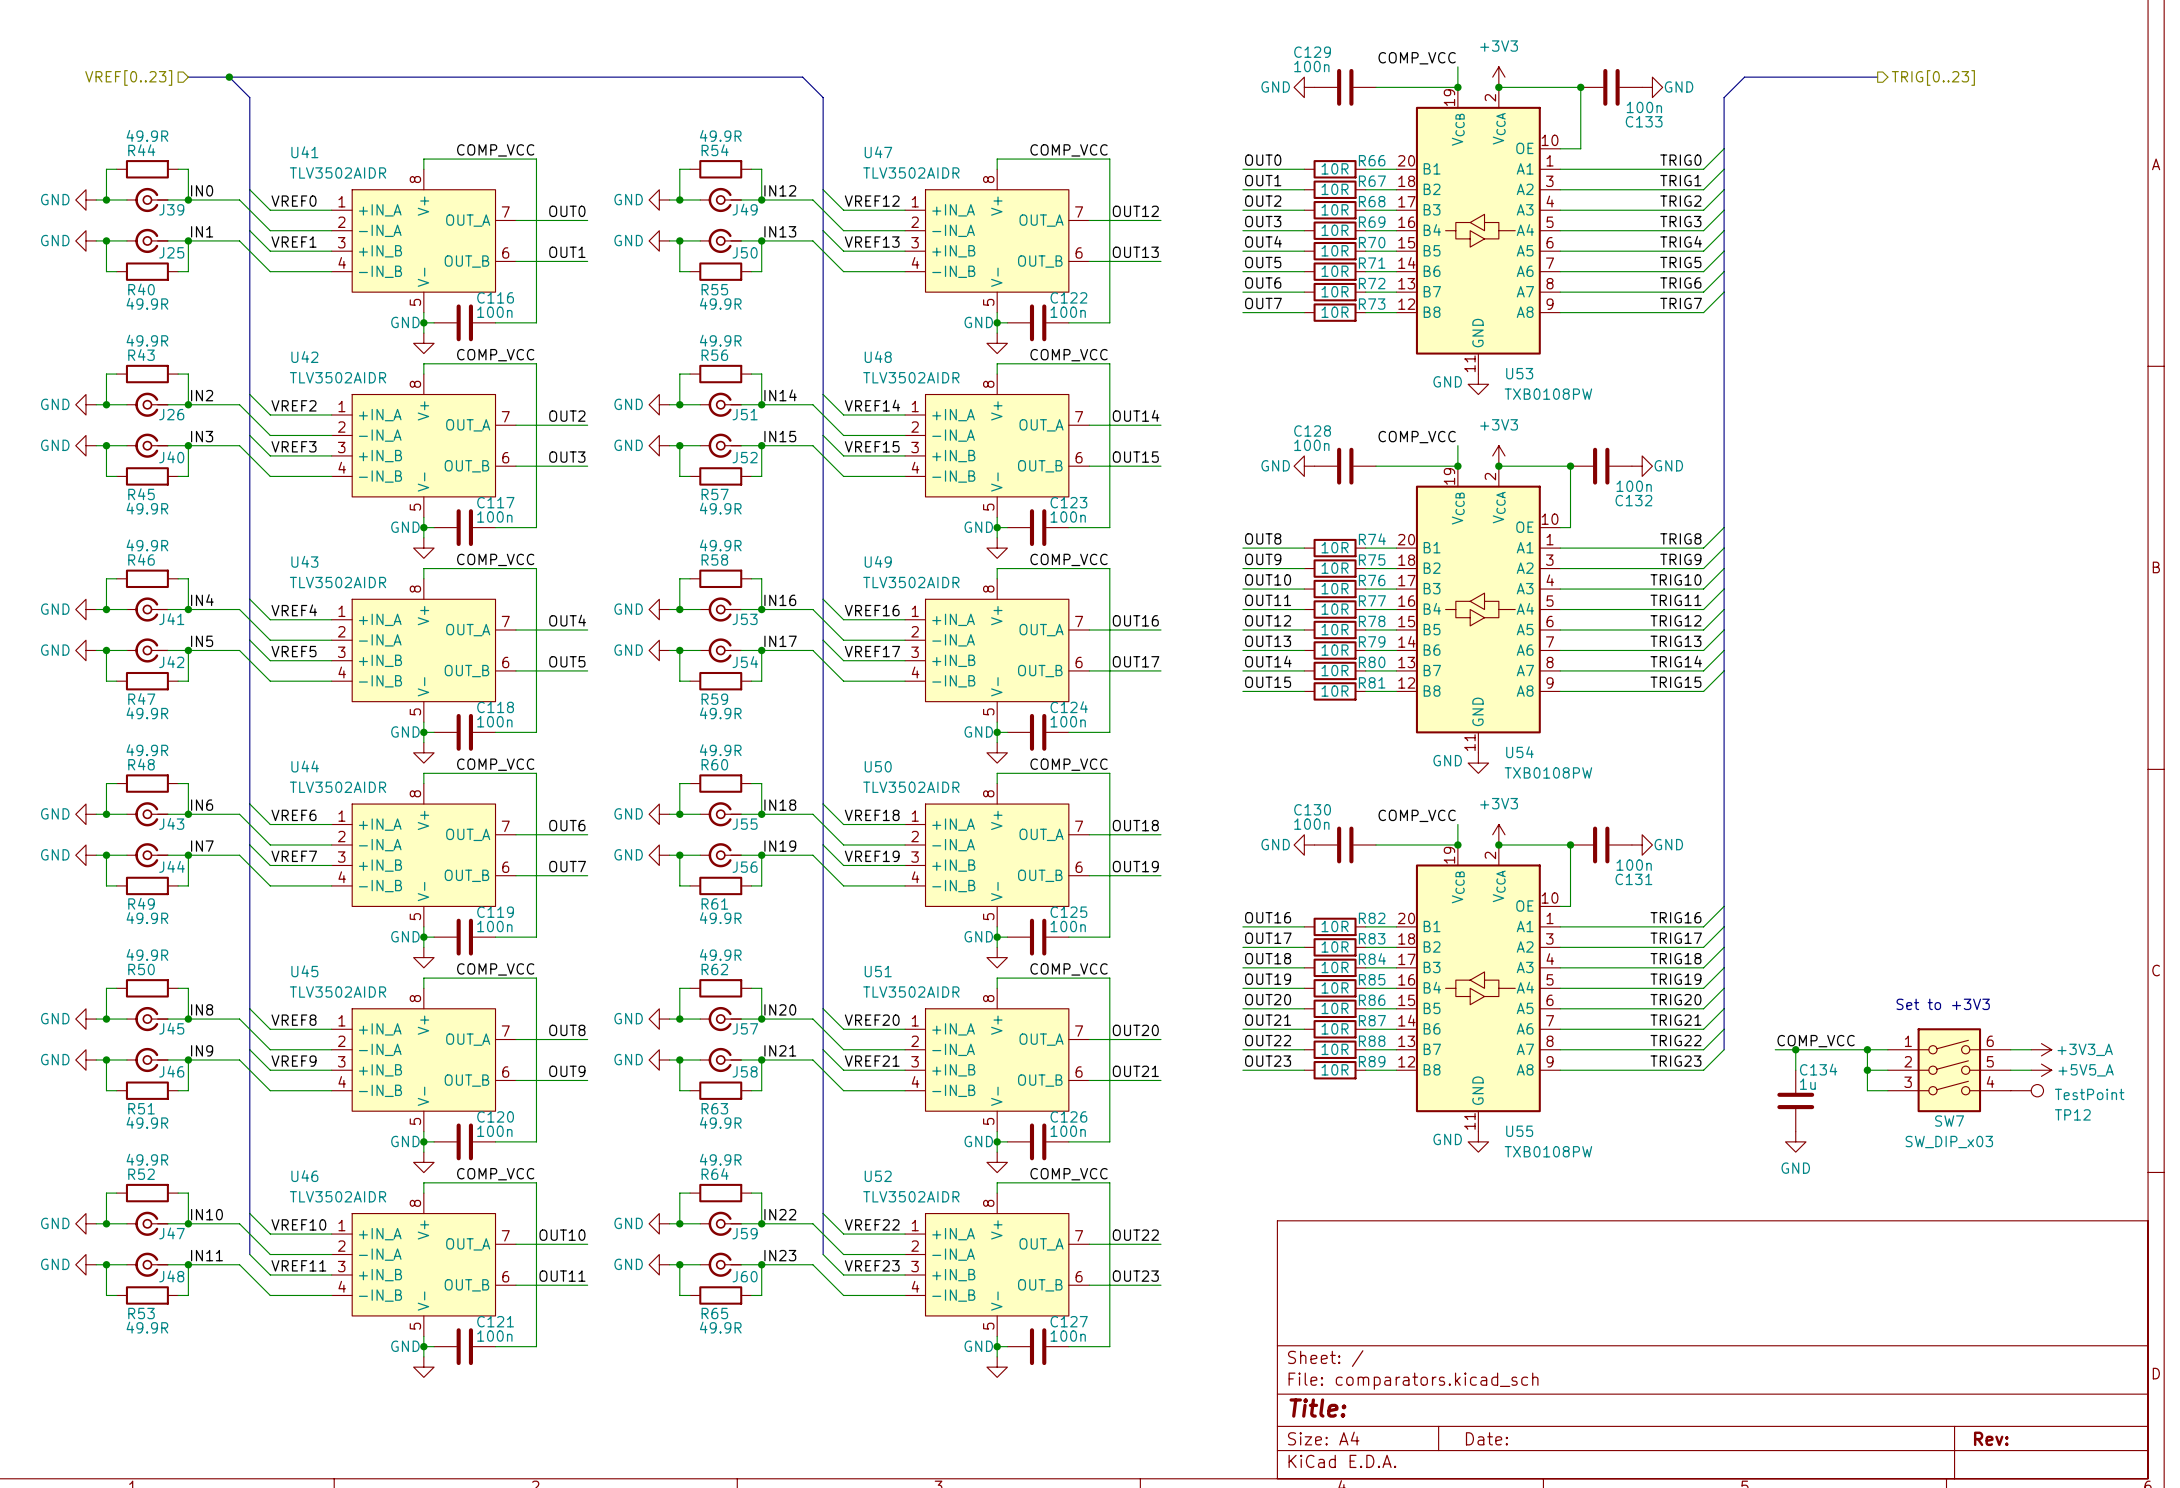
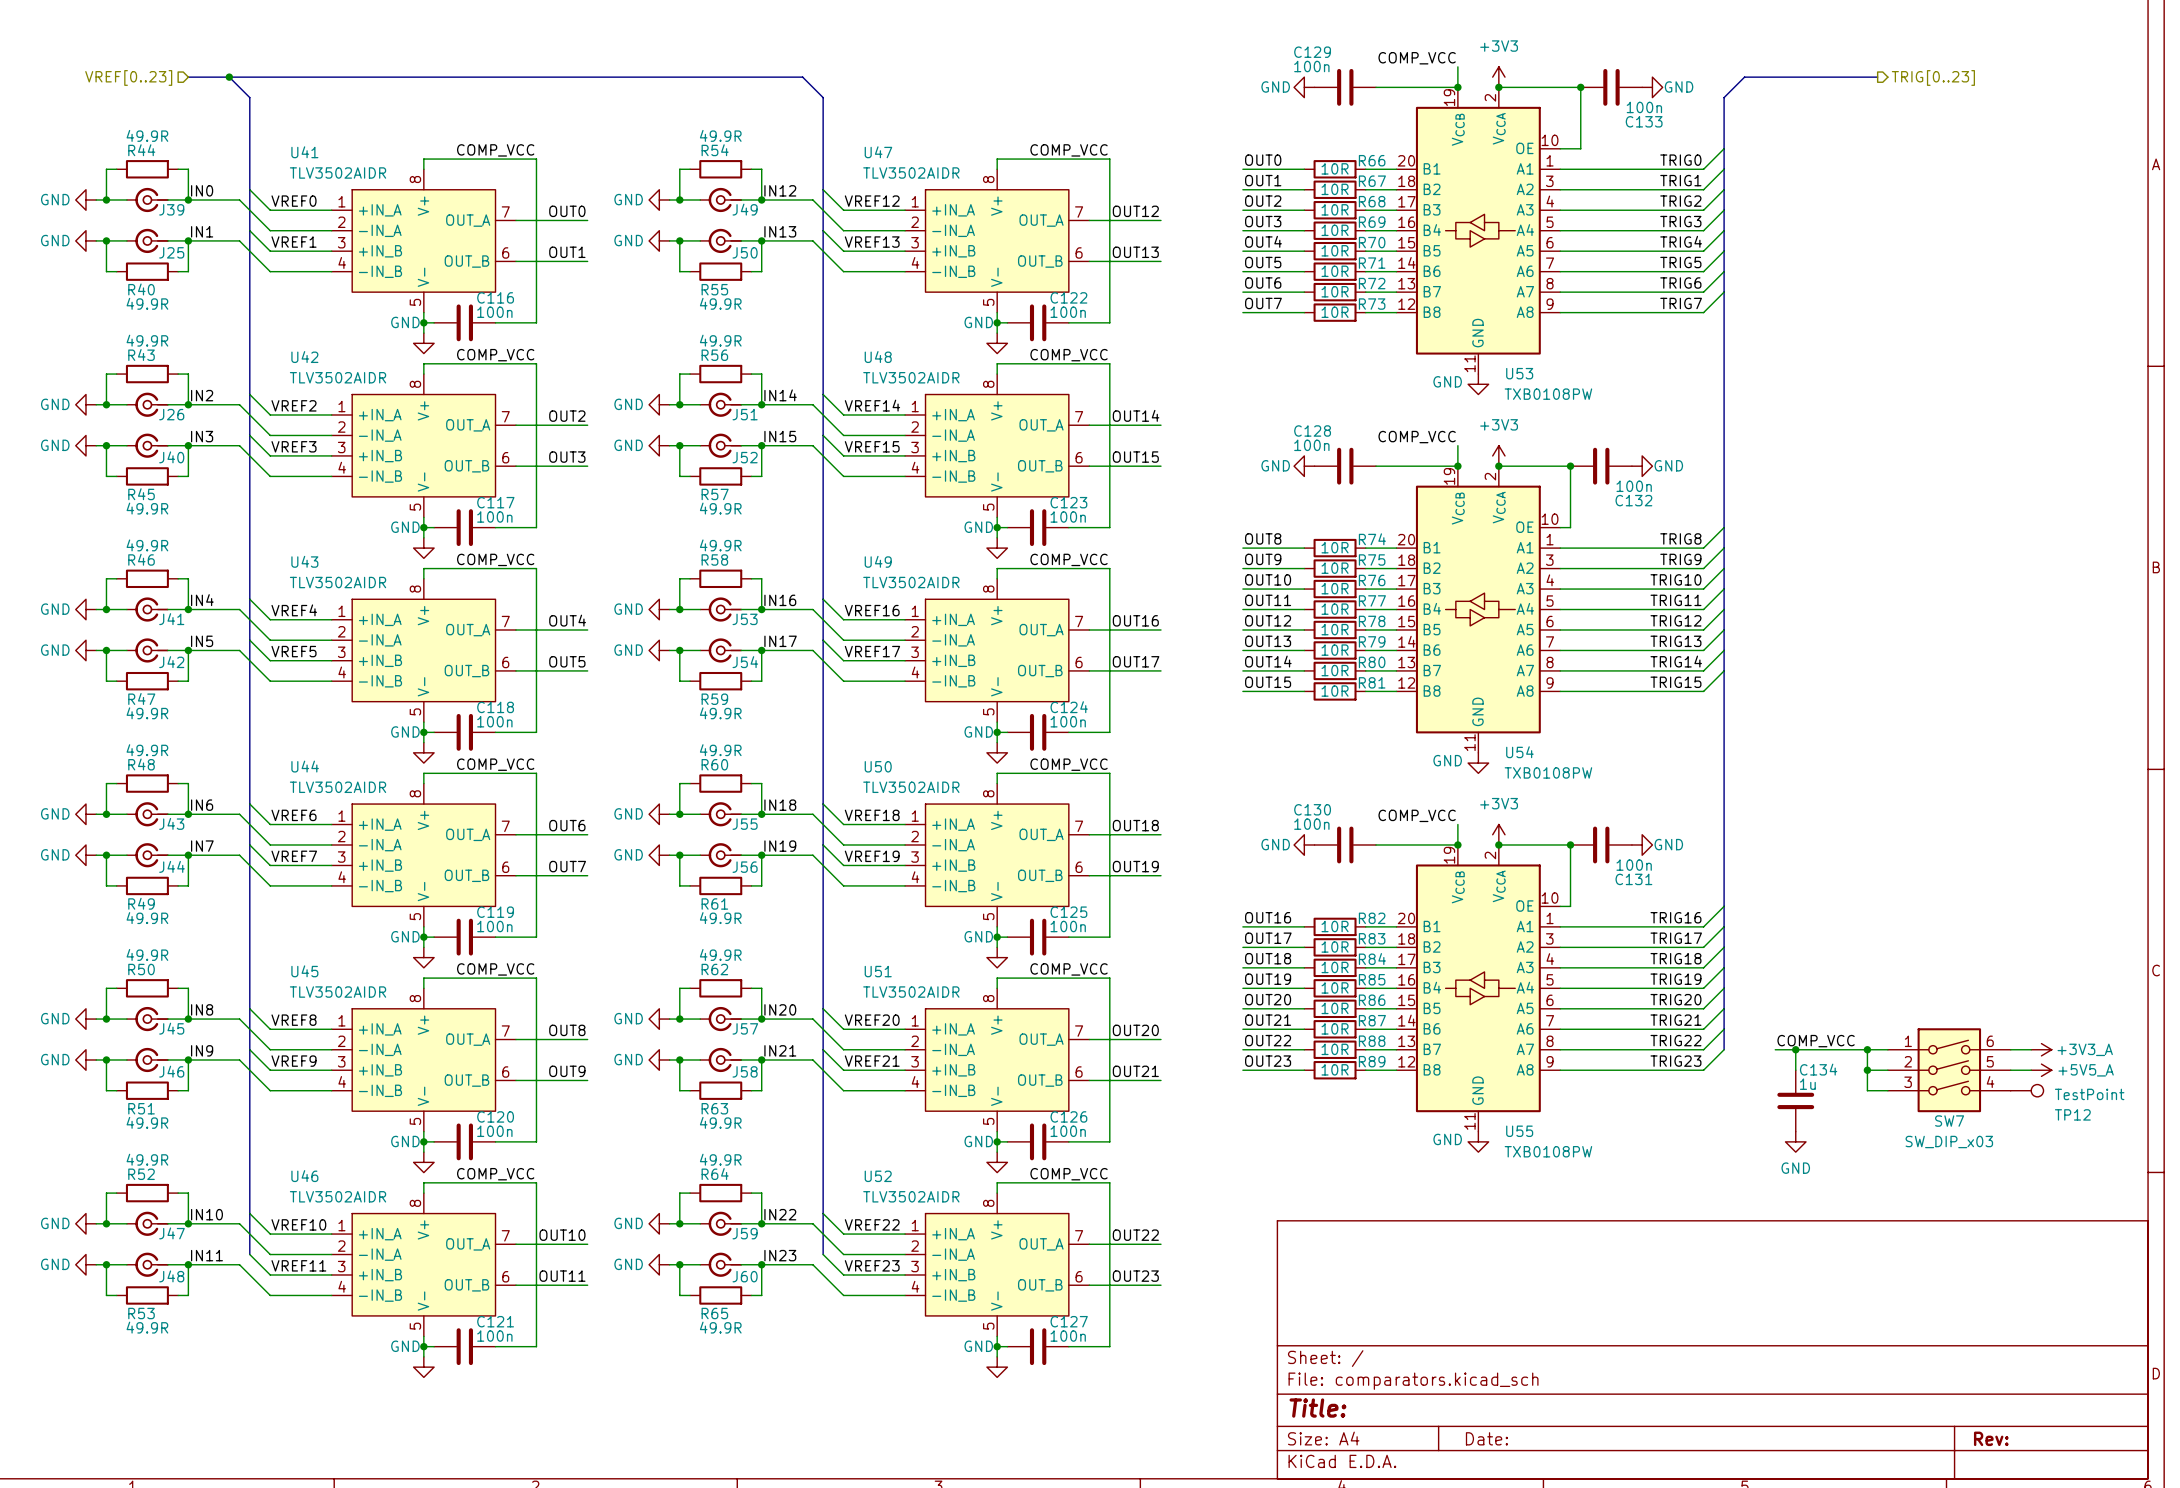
text: Set to +3V3 (1943, 1004) -> none

